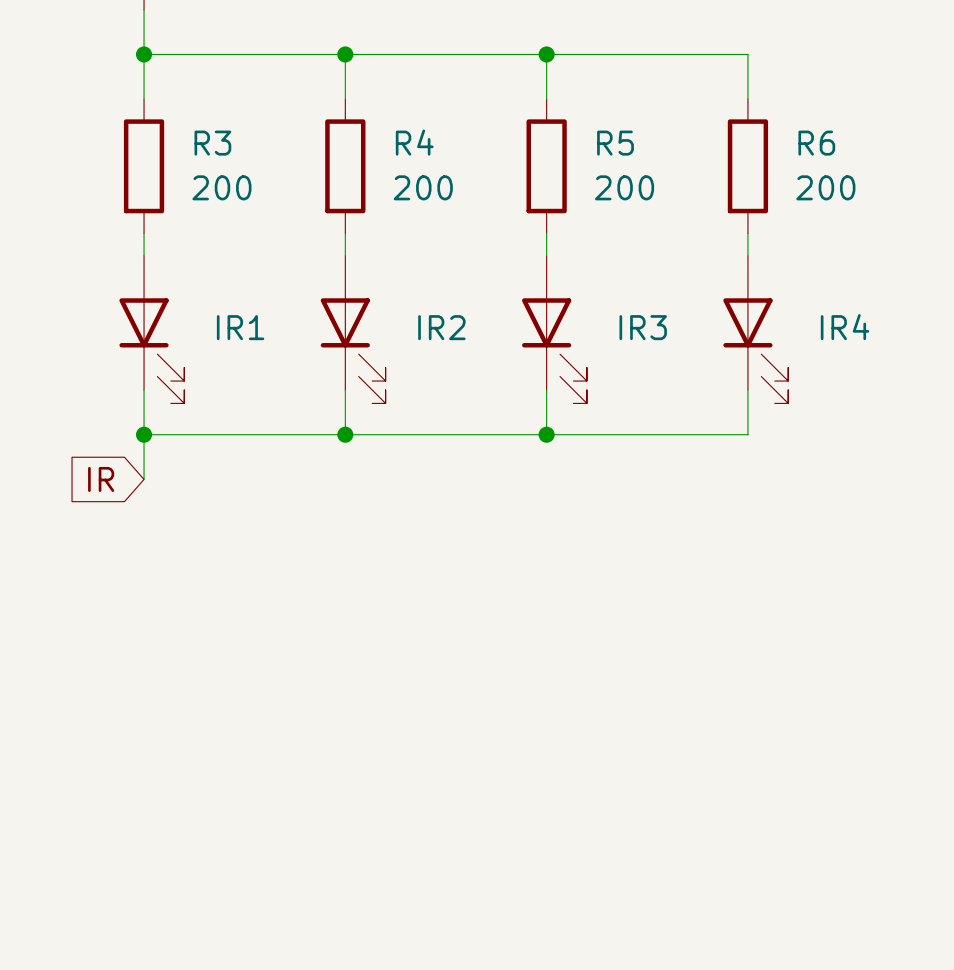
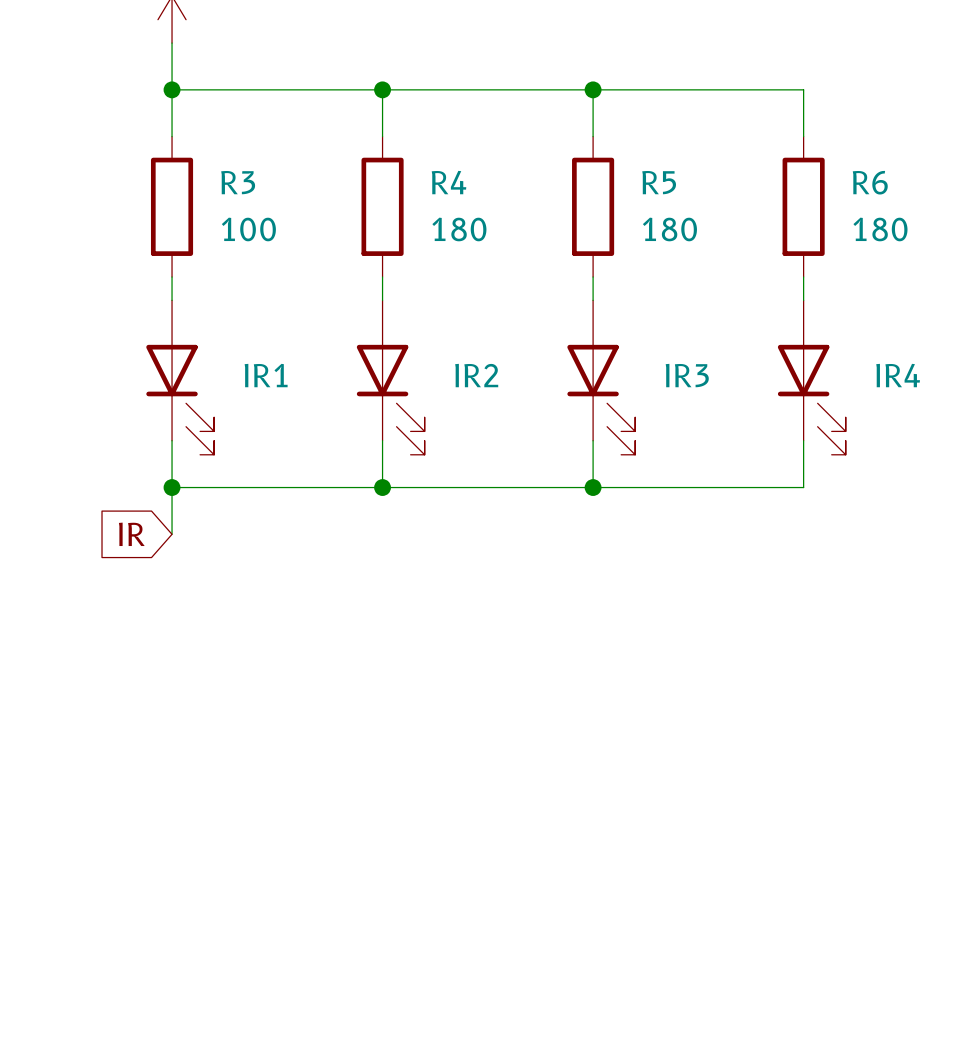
R3 value: 200 (221, 187) -> 100 (248, 229)
R4 value: 200 (423, 187) -> 180 (459, 229)
R5 value: 200 (624, 187) -> 180 (669, 229)
R6 value: 200 (825, 187) -> 180 (880, 229)

